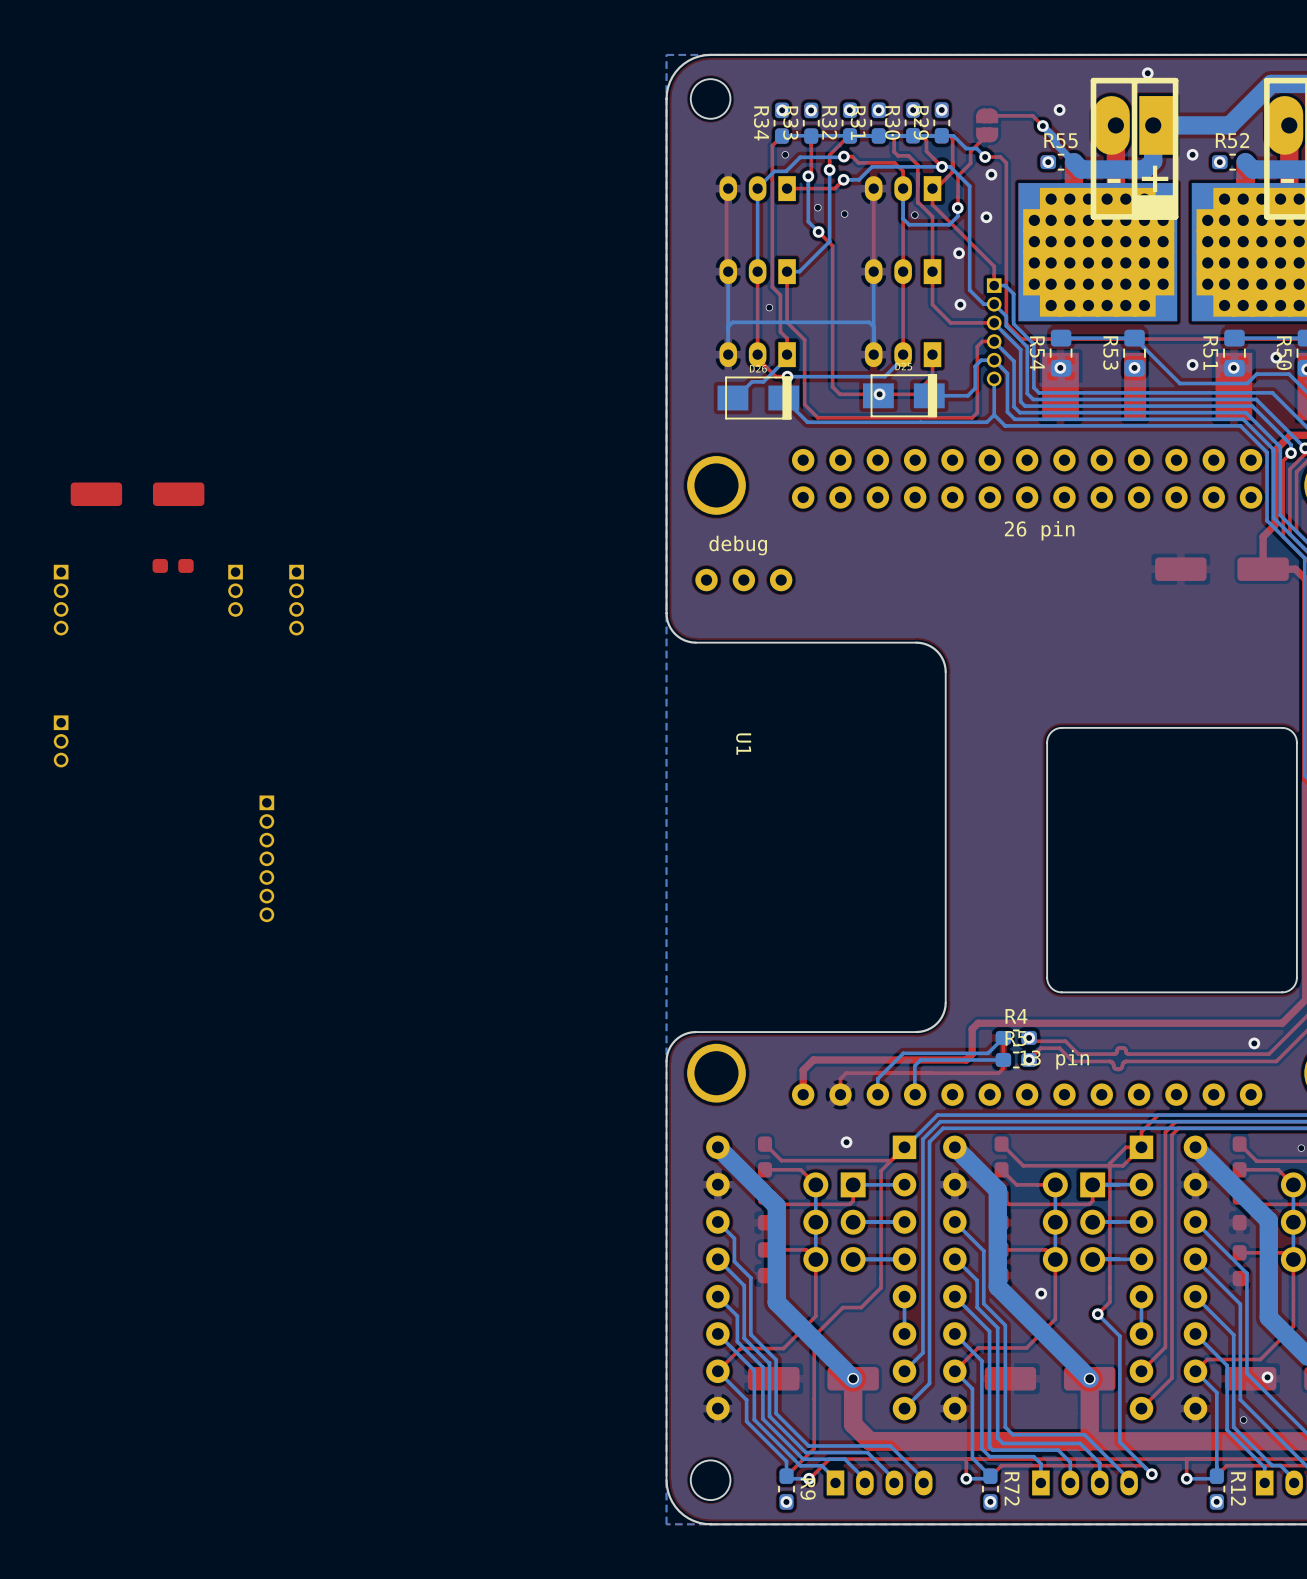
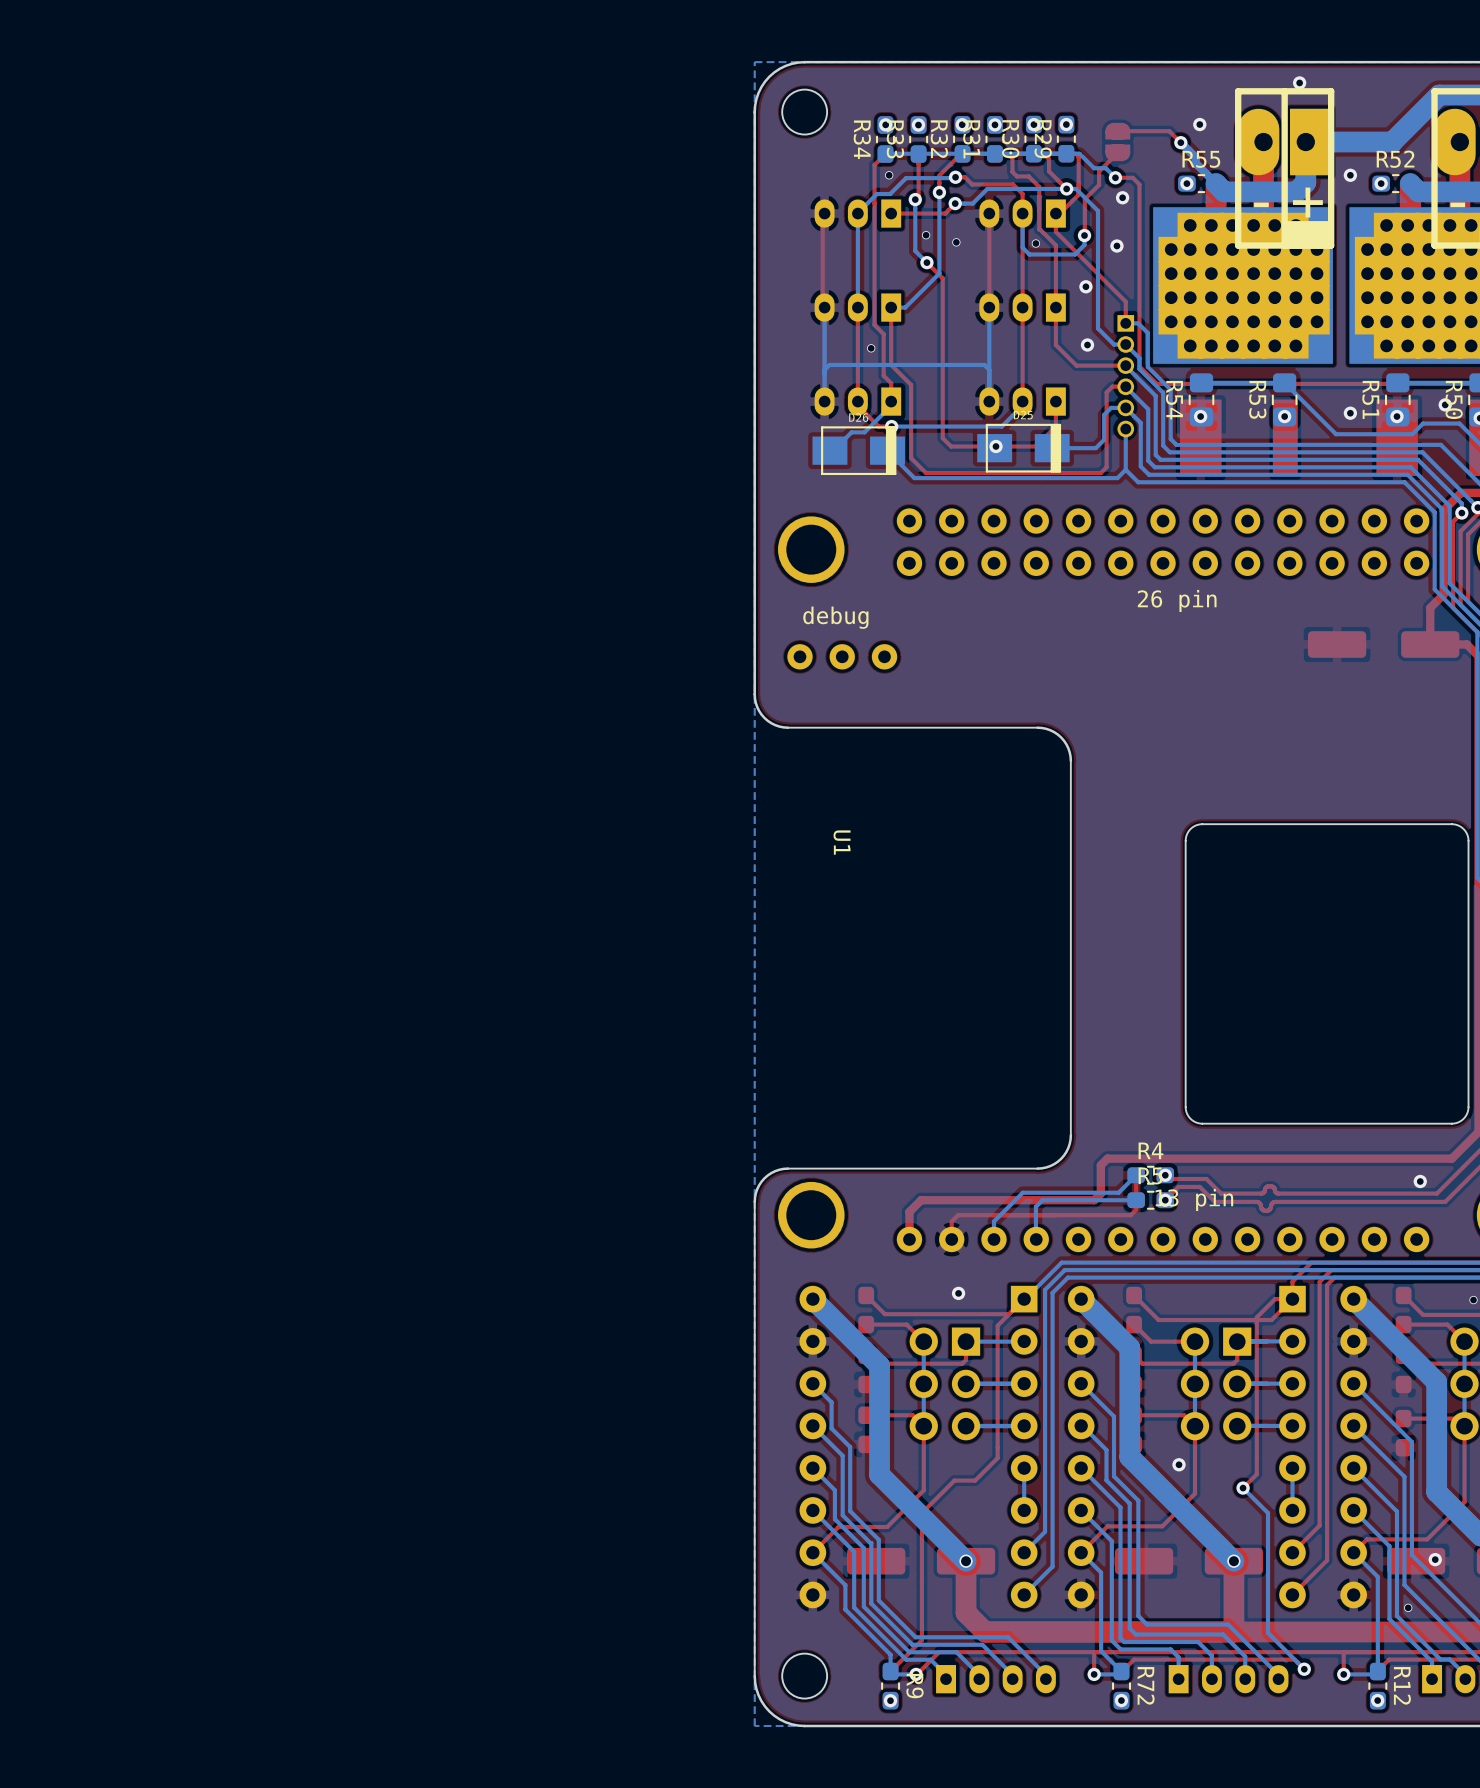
part: (137, 494) -> none
part: (173, 565) -> none
part: (235, 590) -> none
part: (61, 600) -> none
part: (296, 600) -> none
part: (61, 741) -> none
part: (266, 858) -> none

